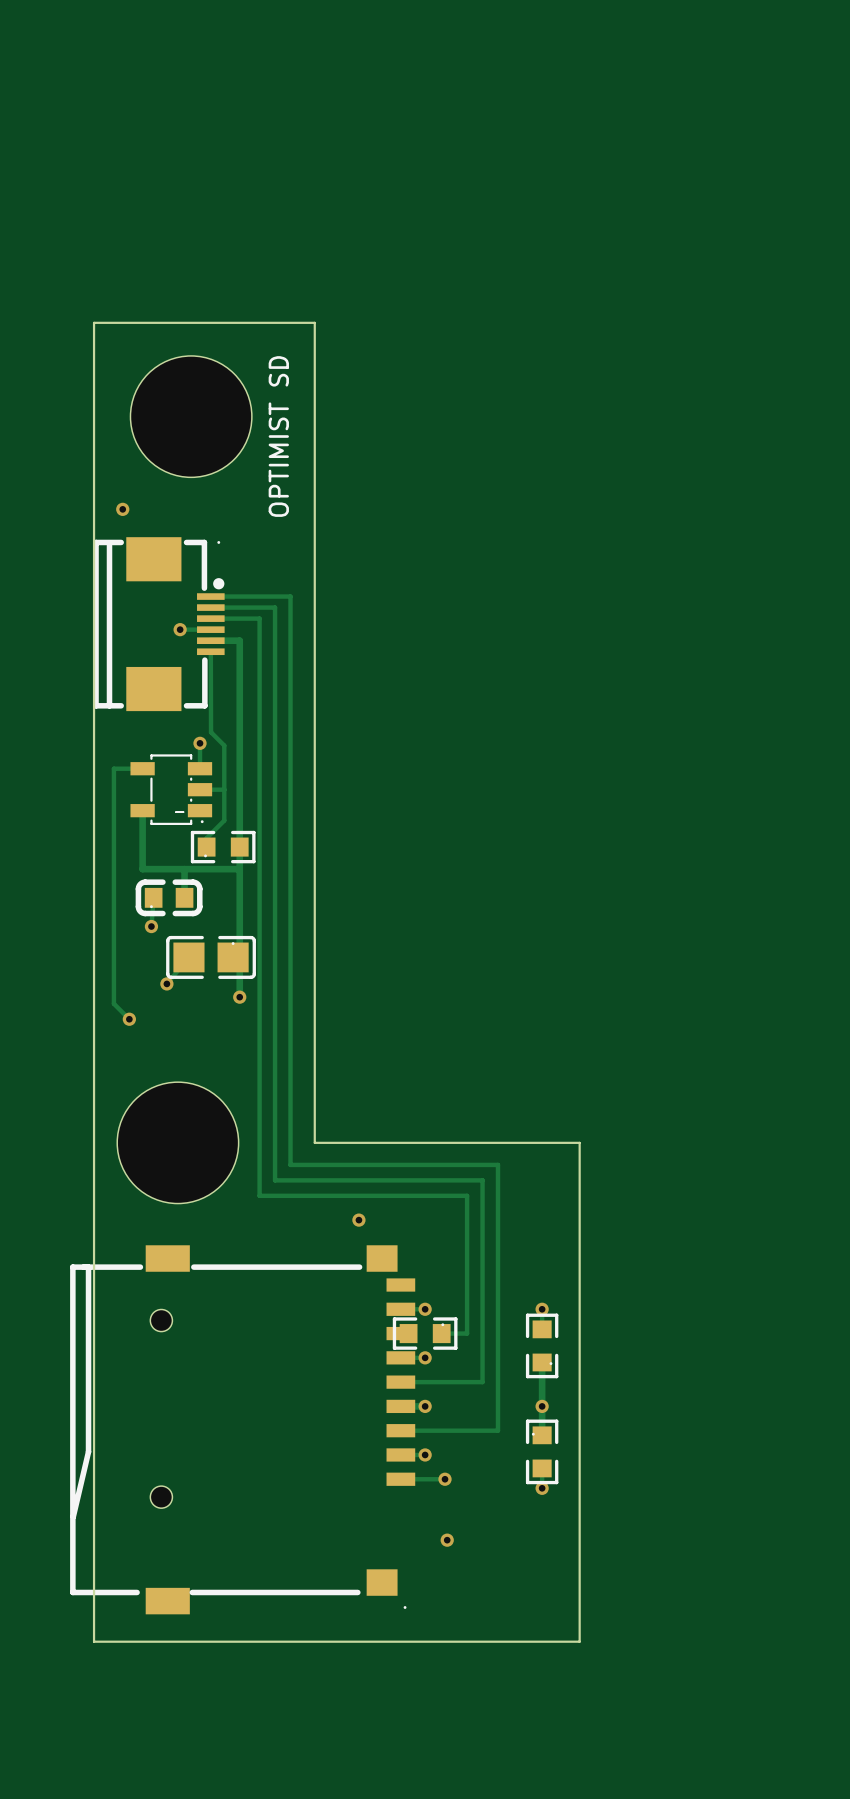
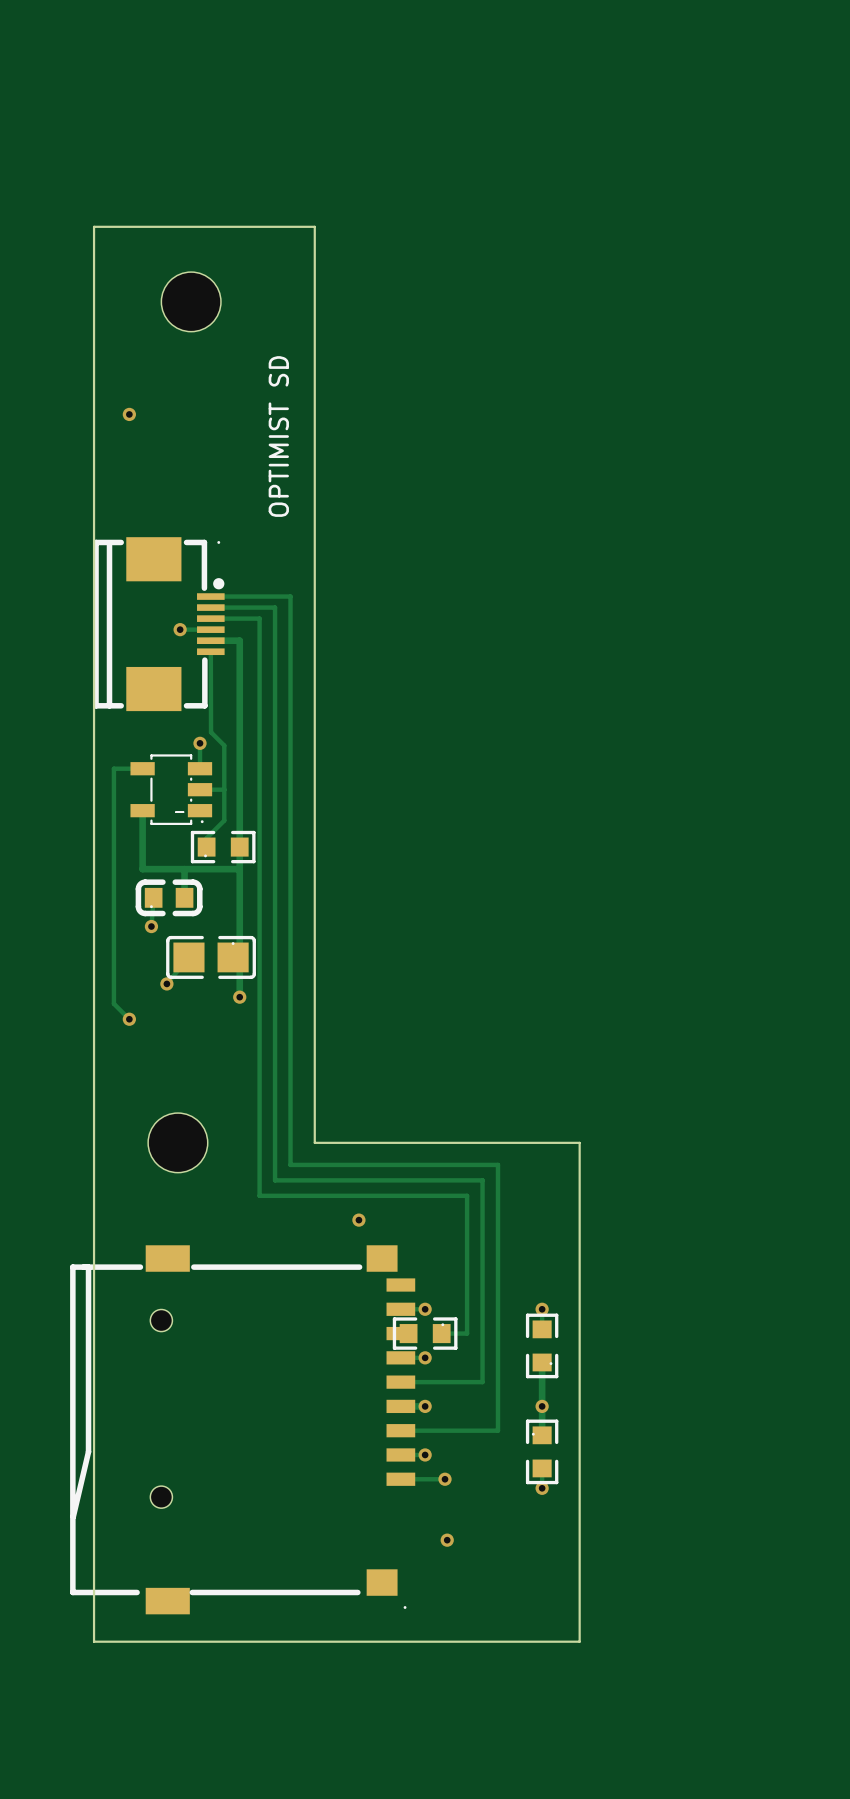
part: none -> (191, 301)
board edge: (94, 322) (314, 322) -> (94, 322) (94, 226) (314, 226) (314, 322)
part: (191, 416) -> none
via position: (122, 509) -> (129, 414)
part footprint: [117, 1082, 239, 1204] -> [148, 1113, 208, 1173]

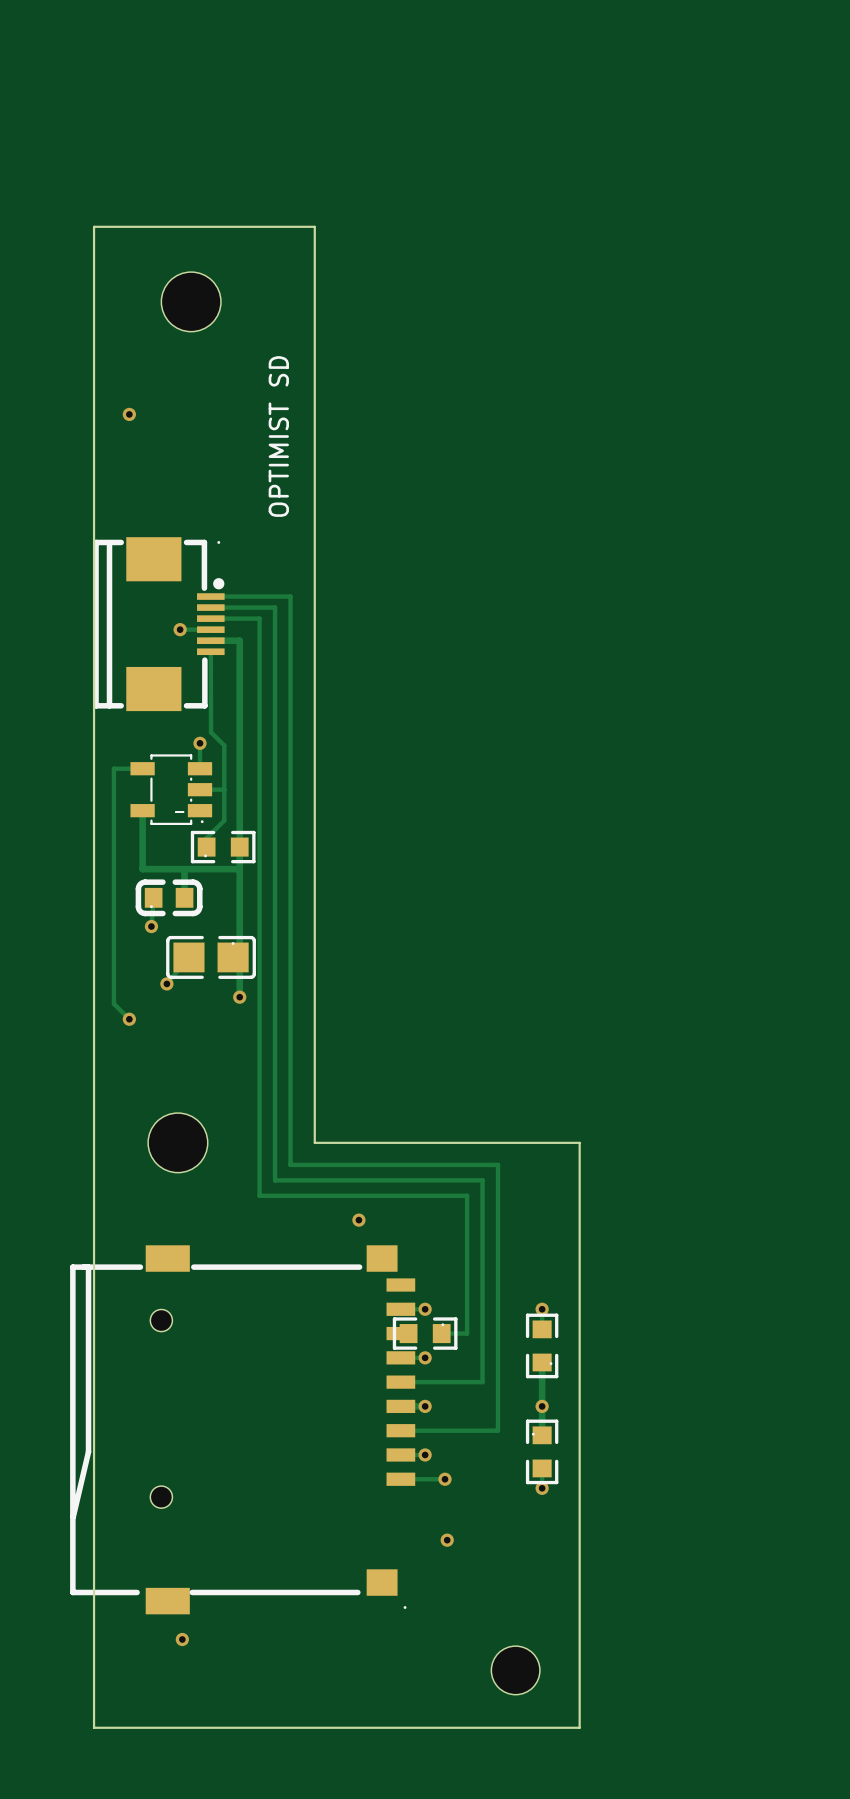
via: none -> (182, 1639)
board edge: (94, 1641) (579, 1641) -> (94, 1641) (94, 1727) (579, 1727) (579, 1641)
part: none -> (515, 1670)

